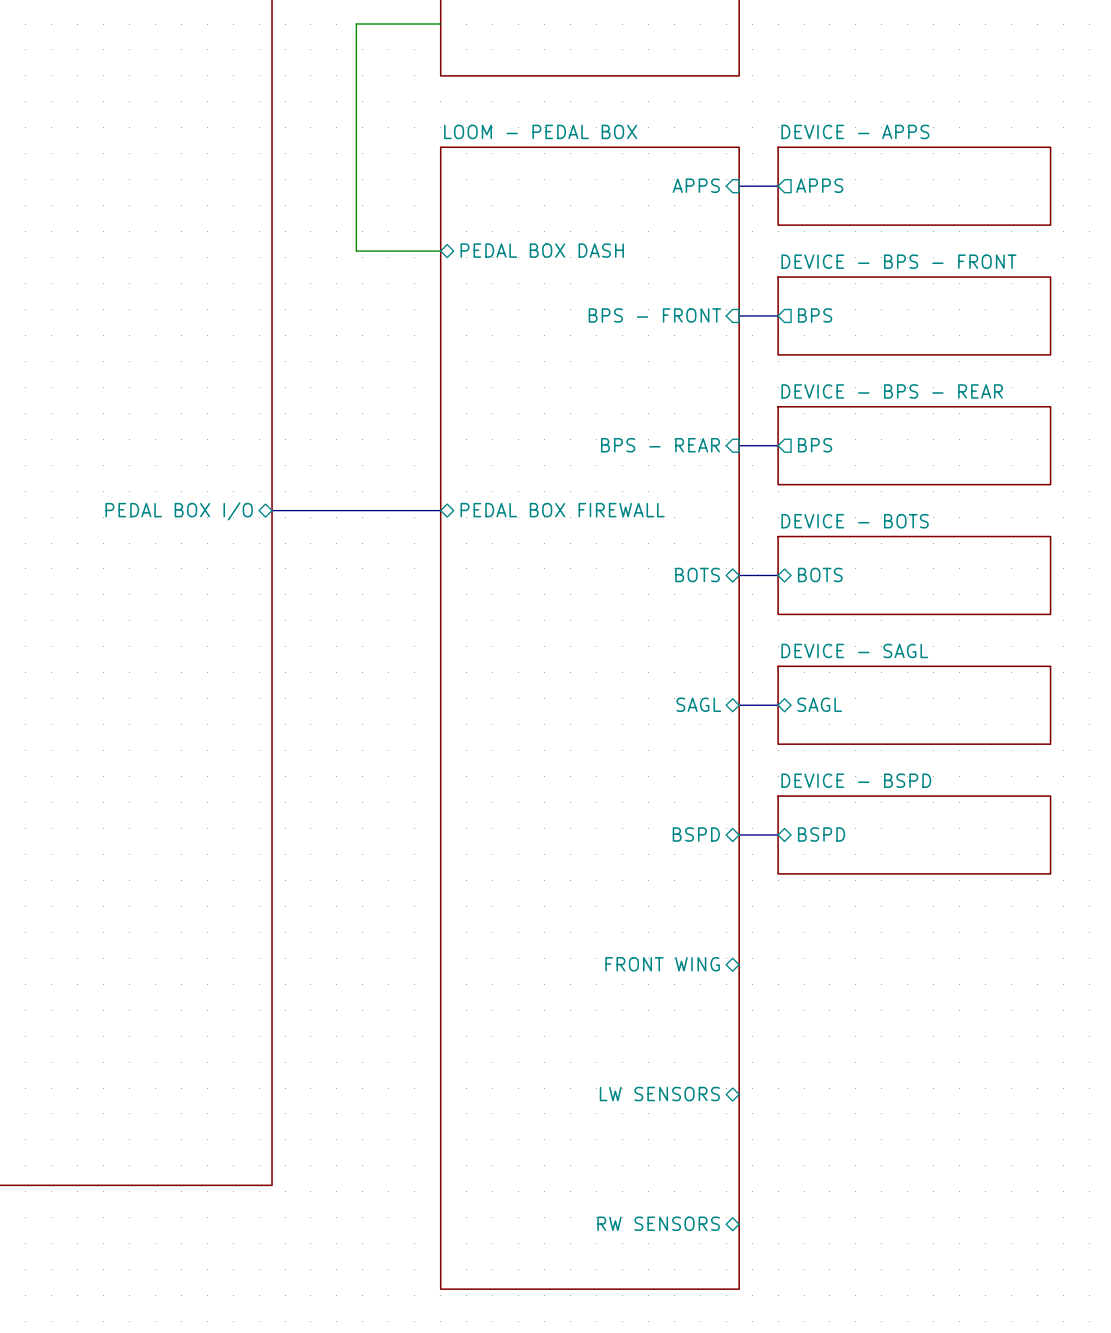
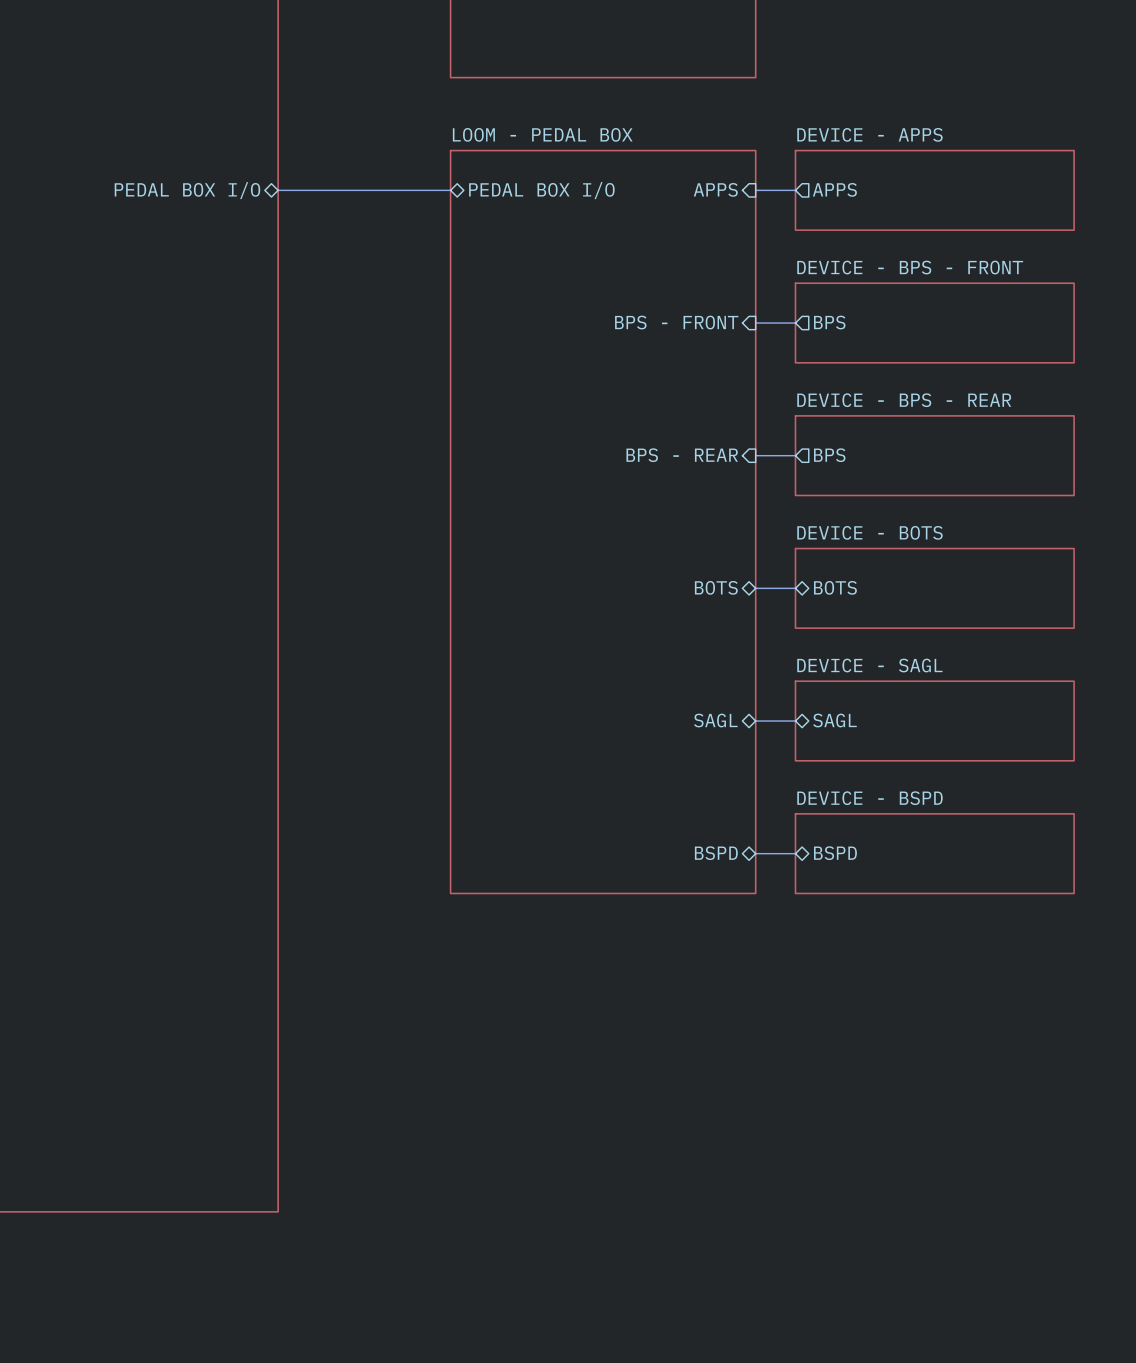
wire: (440, 24) (356, 24) (356, 251) (440, 251) -> none
sheet pin: none -> PEDAL BOX I/O (187, 190)
bus: none -> (278, 190) (450, 190)
sheet pin: none -> PEDAL BOX I/O (541, 190)
sheet pin: PEDAL BOX DASH (542, 250) -> none
bus: (272, 510) (440, 510) -> none
sheet pin: PEDAL BOX FIREWALL (562, 510) -> none
sheet LOOM - PEDAL BOX: none -> (603, 522)
sheet pin: PEDAL BOX I/O (179, 511) -> none
sheet LOOM - PEDAL BOX: (589, 718) -> none
sheet pin: FRONT WING (662, 964) -> none
sheet pin: LW SENSORS (659, 1094) -> none
sheet pin: RW SENSORS (658, 1223) -> none

